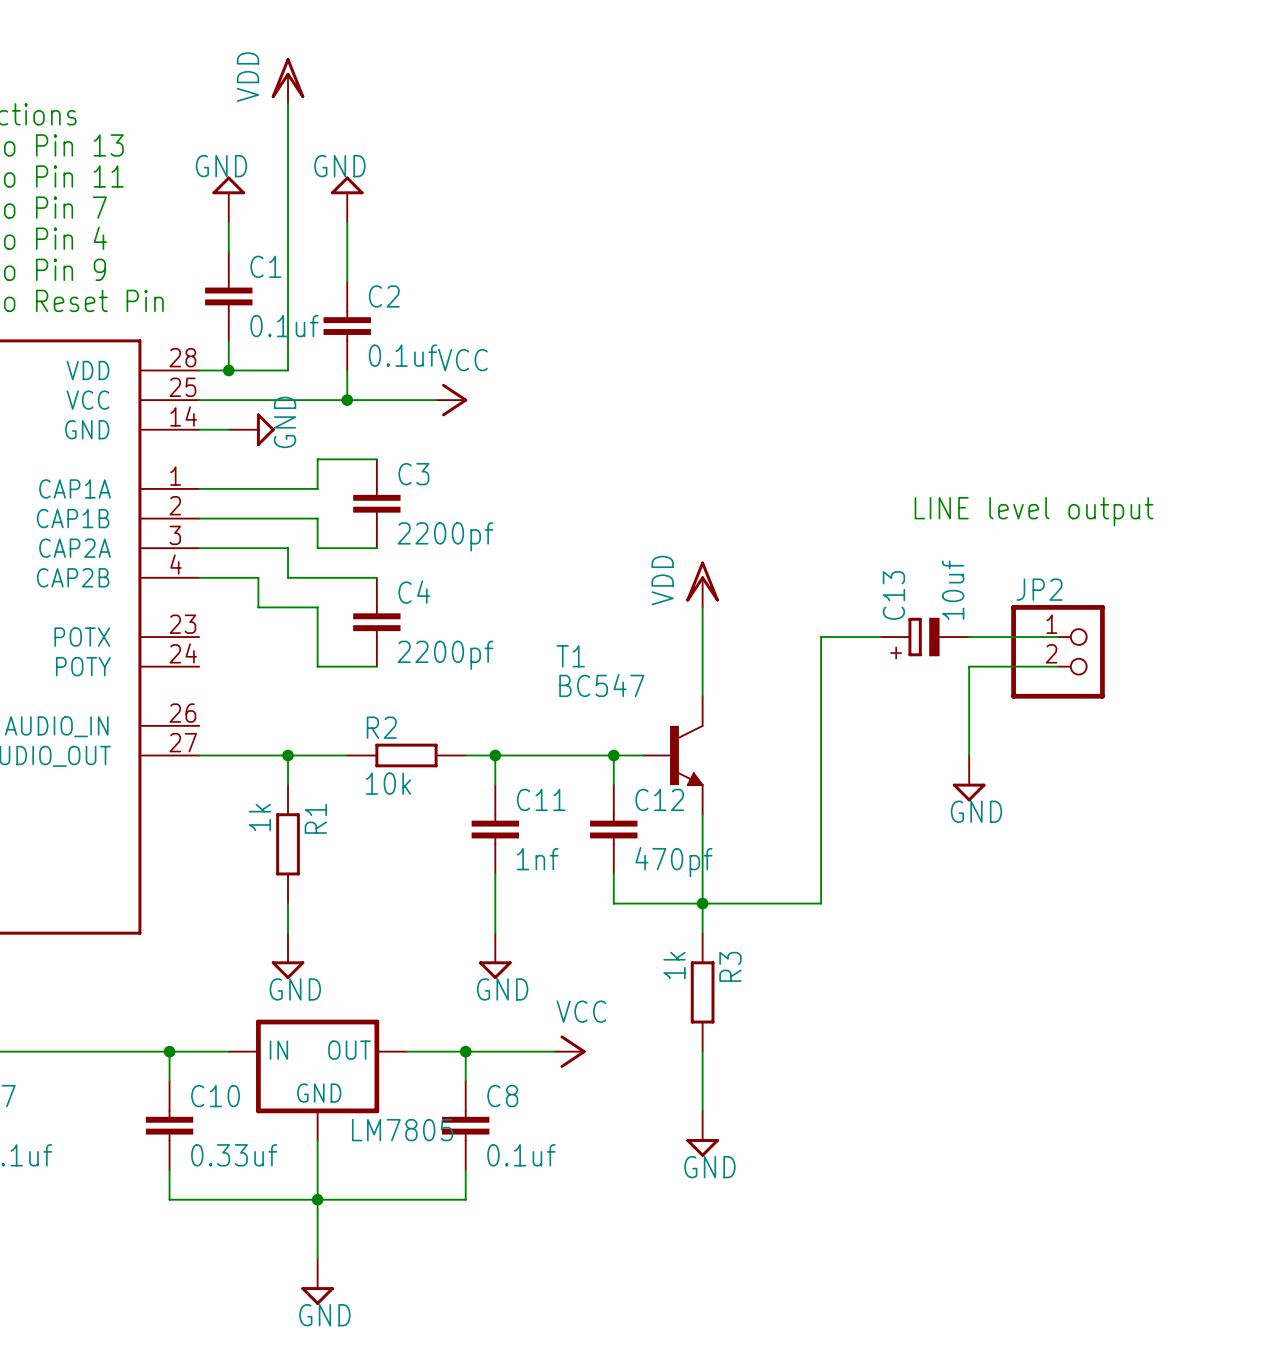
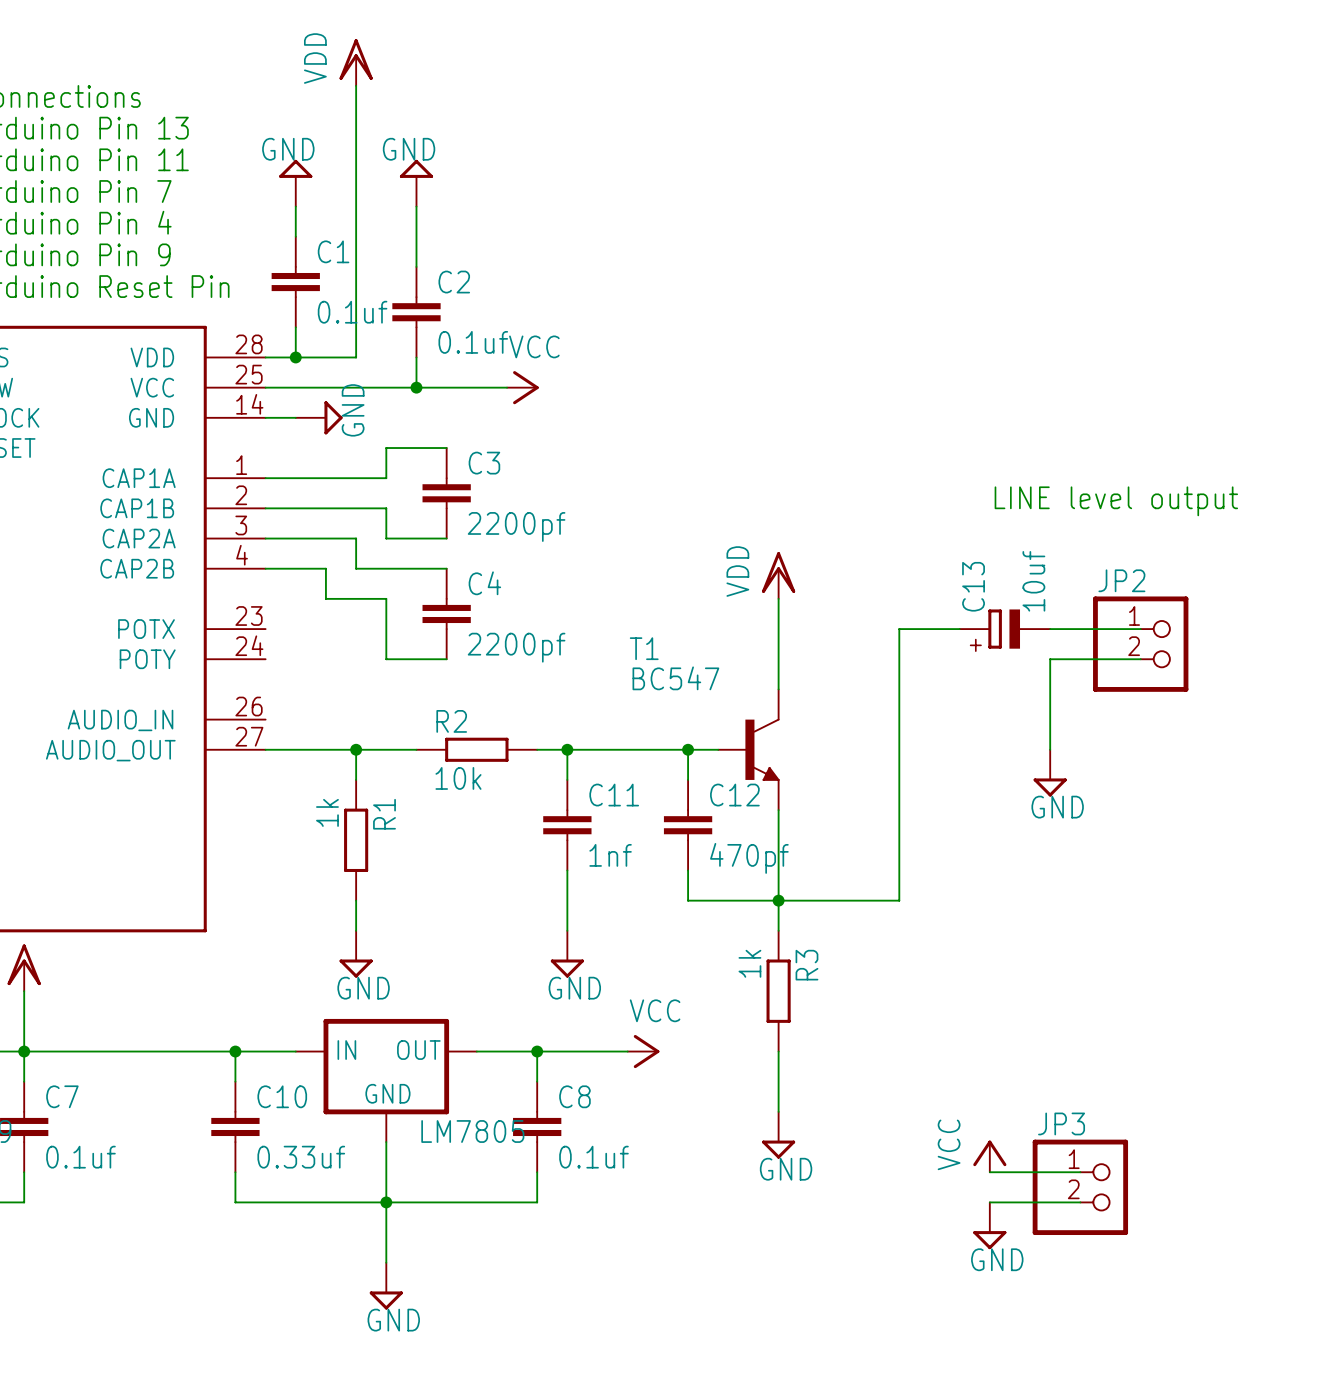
power symbol: none -> VCC (989, 1156)
wire: none -> (989, 1172) (1080, 1172)
JP3: none -> (1080, 1187)
wire: none -> (989, 1202) (1080, 1202)
power symbol: none -> GND (989, 1225)

